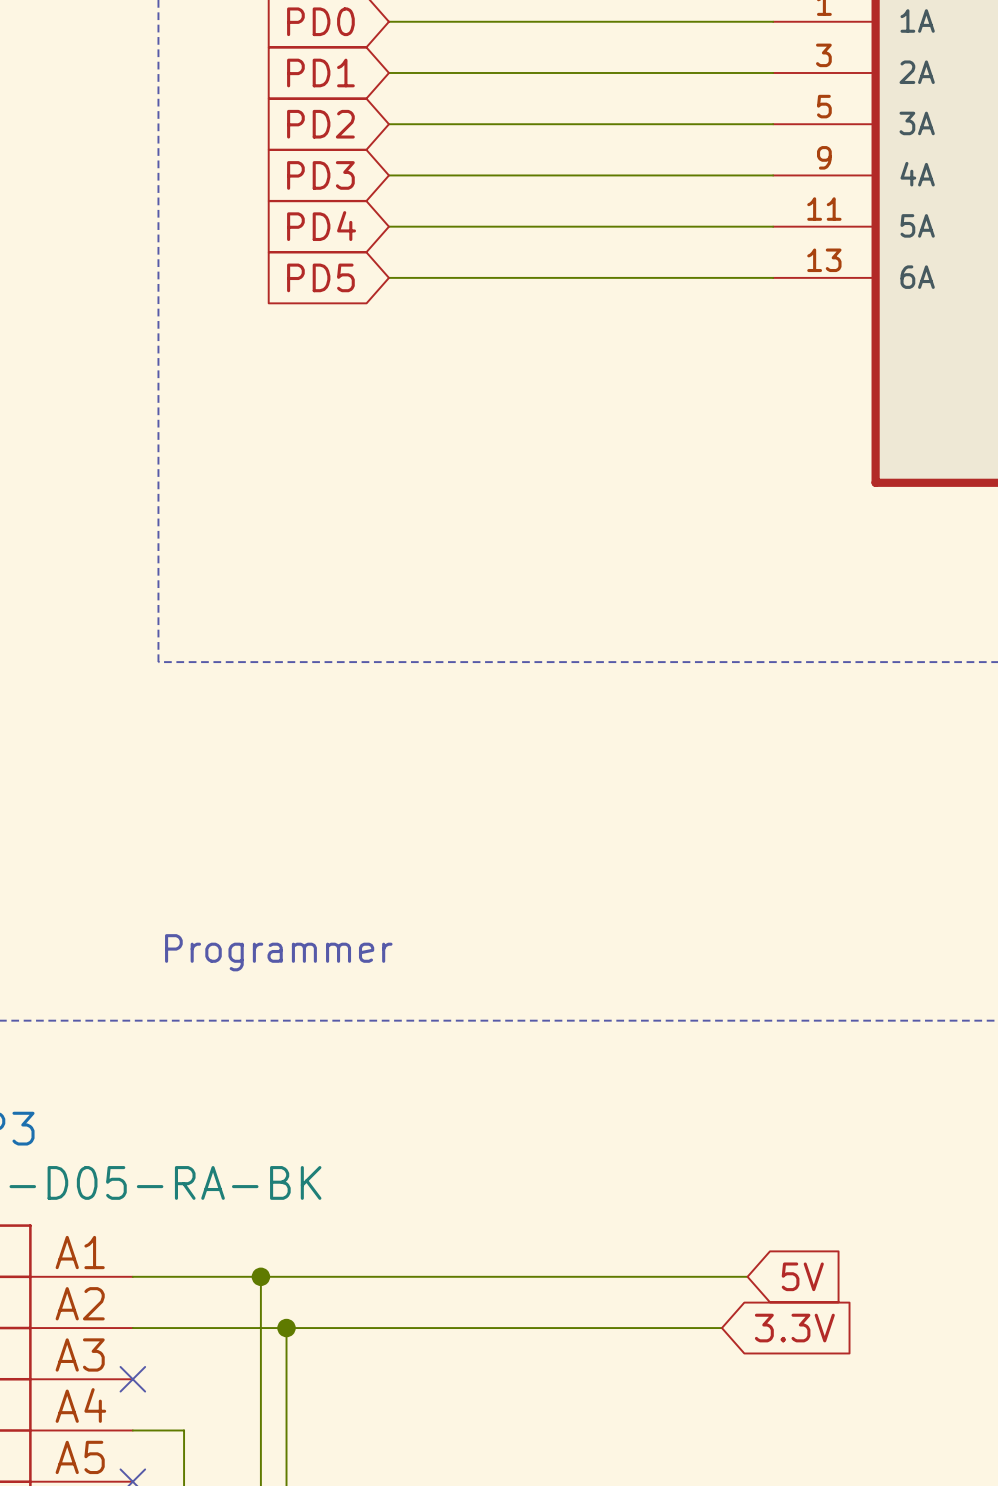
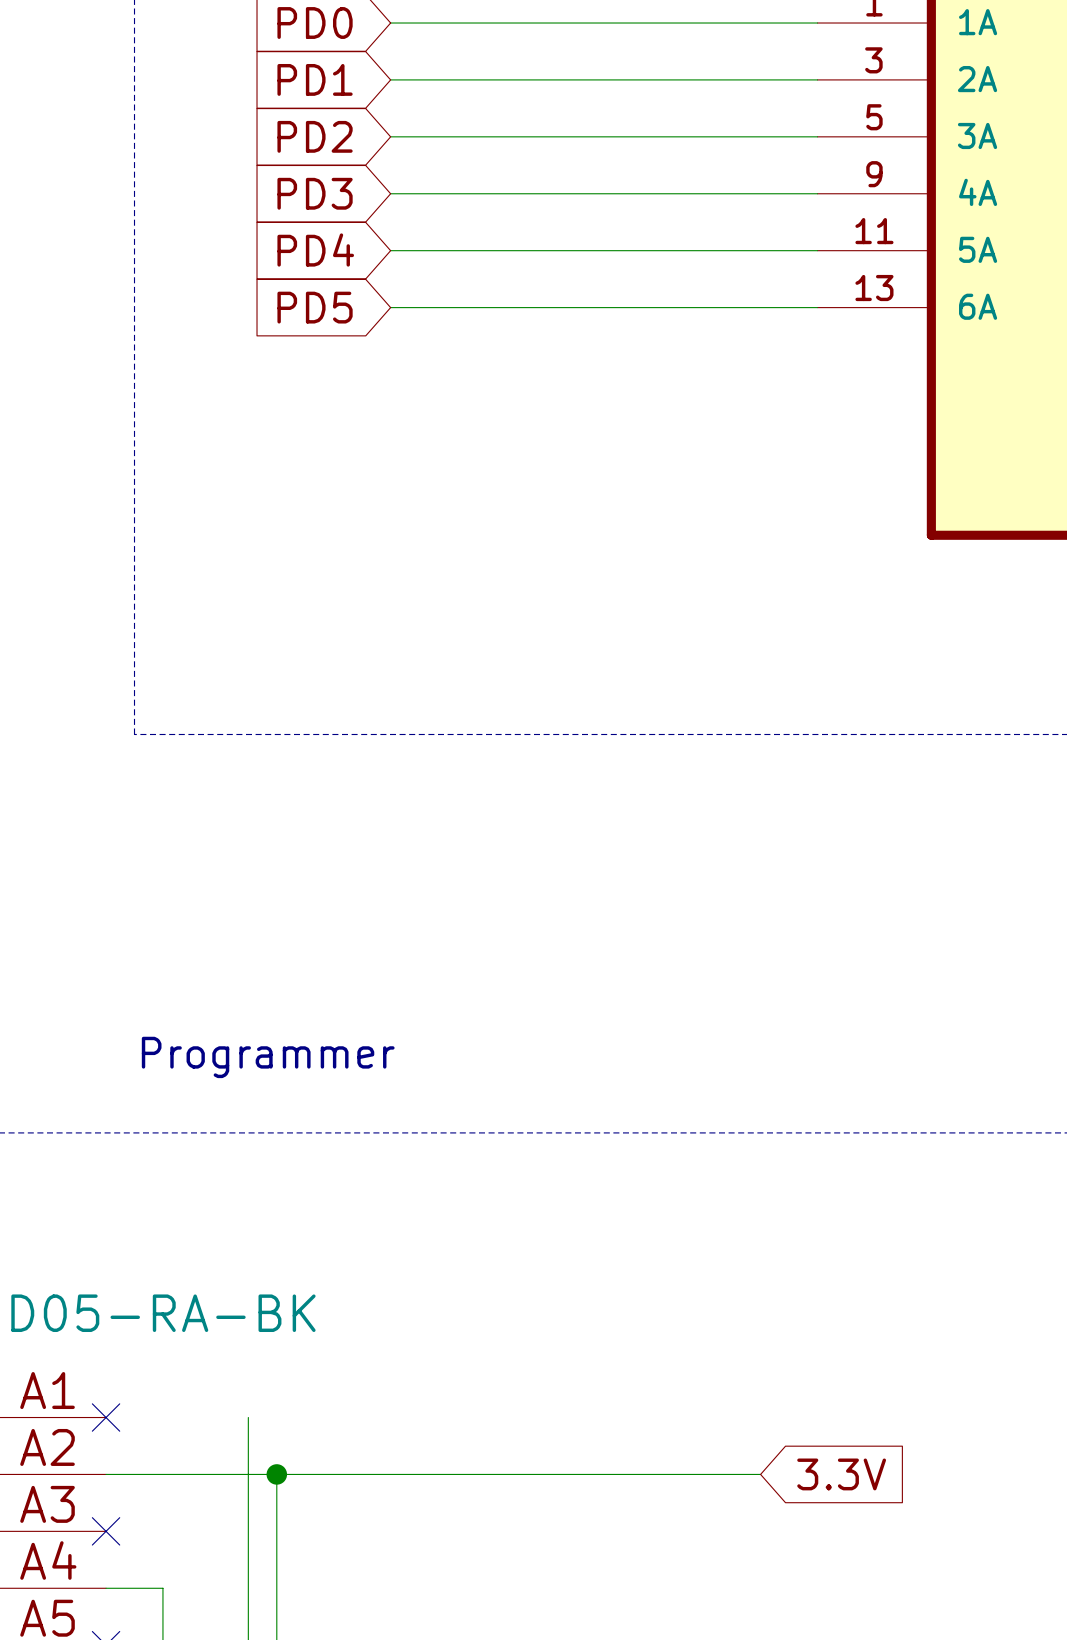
wire: (132, 1276) (747, 1276) -> none
no-connect mark: none -> (106, 1417)
junction: (260, 1276) -> none
global label: 5V (802, 1276) -> none

